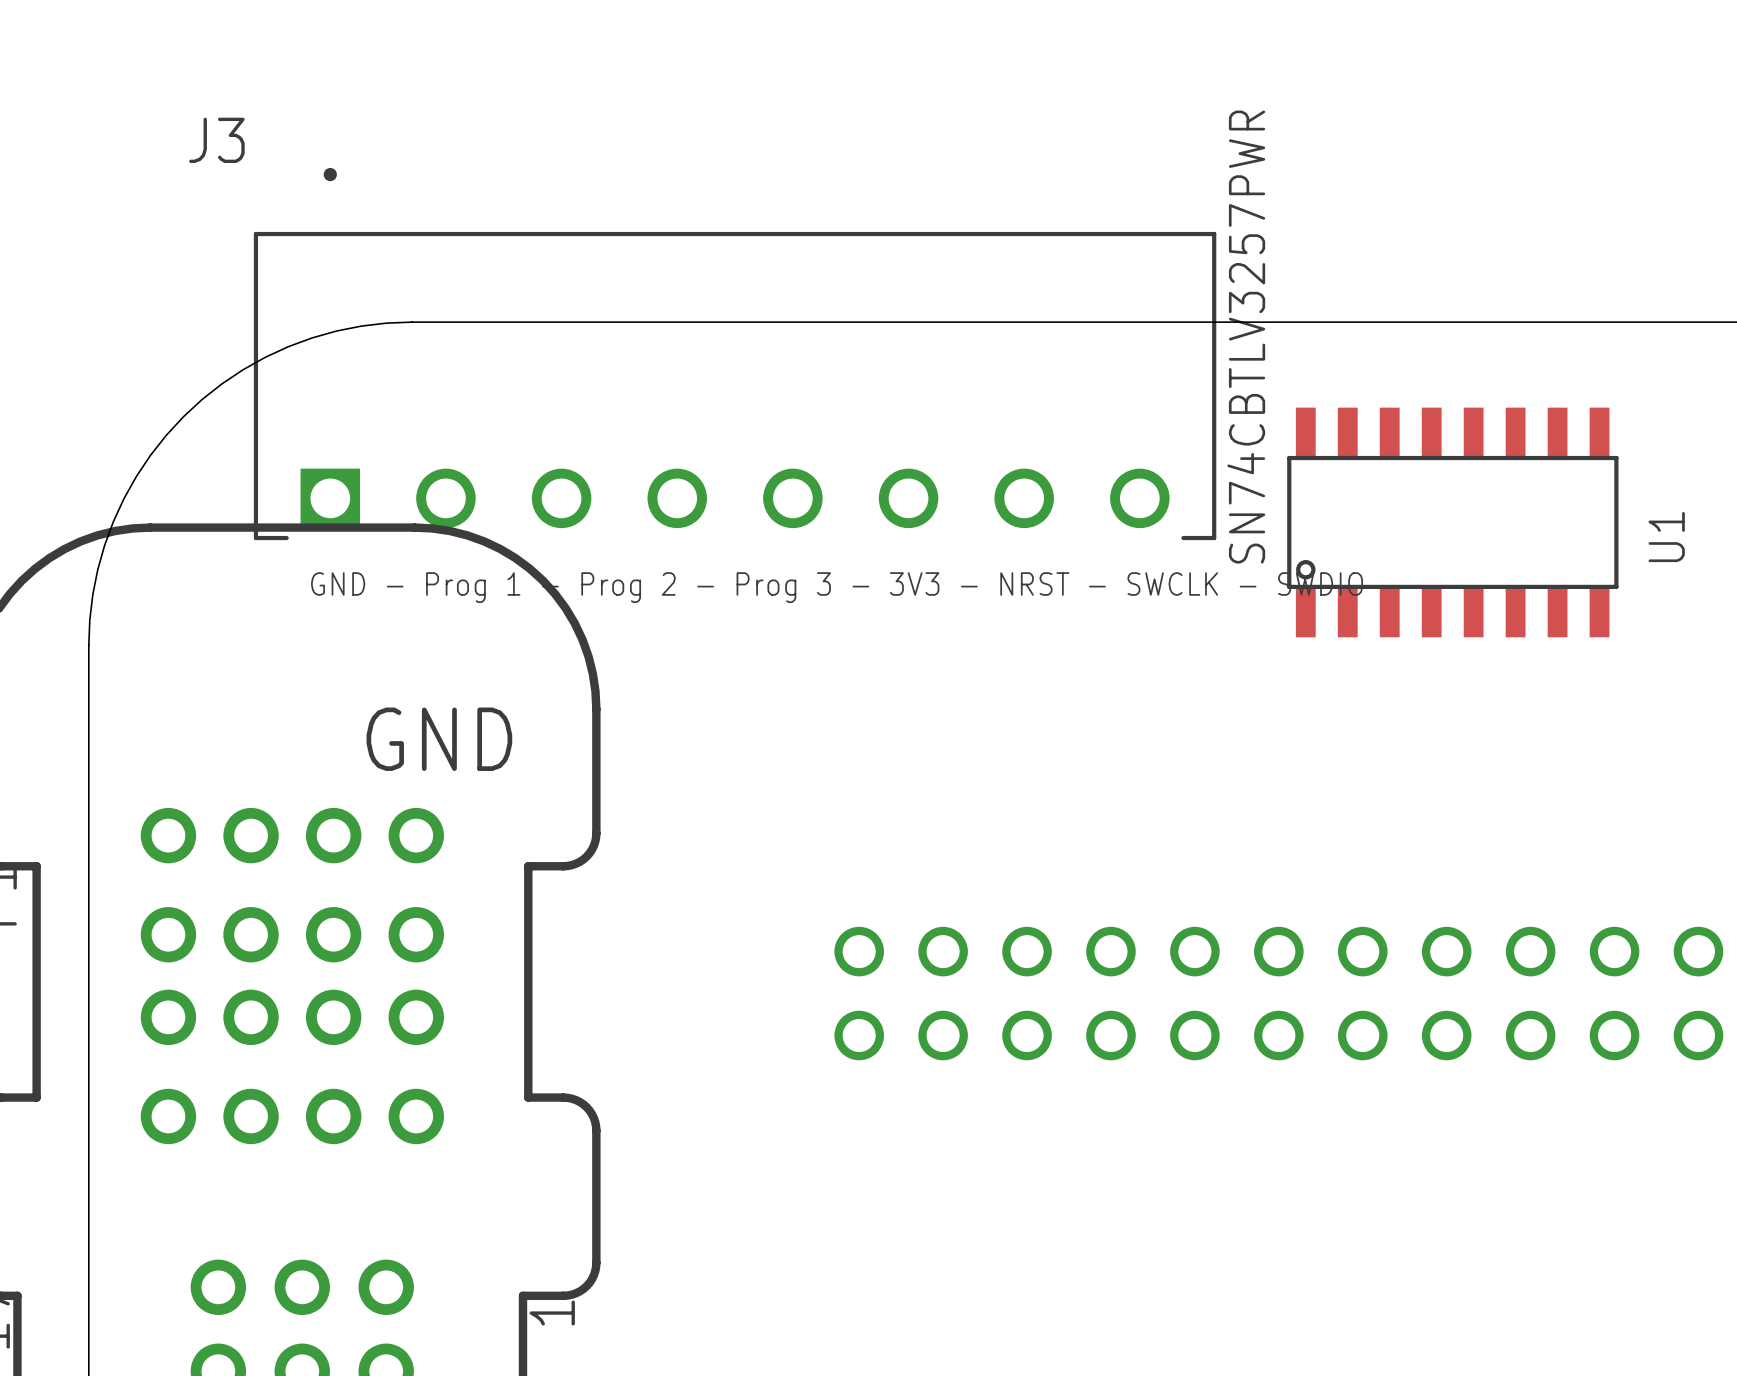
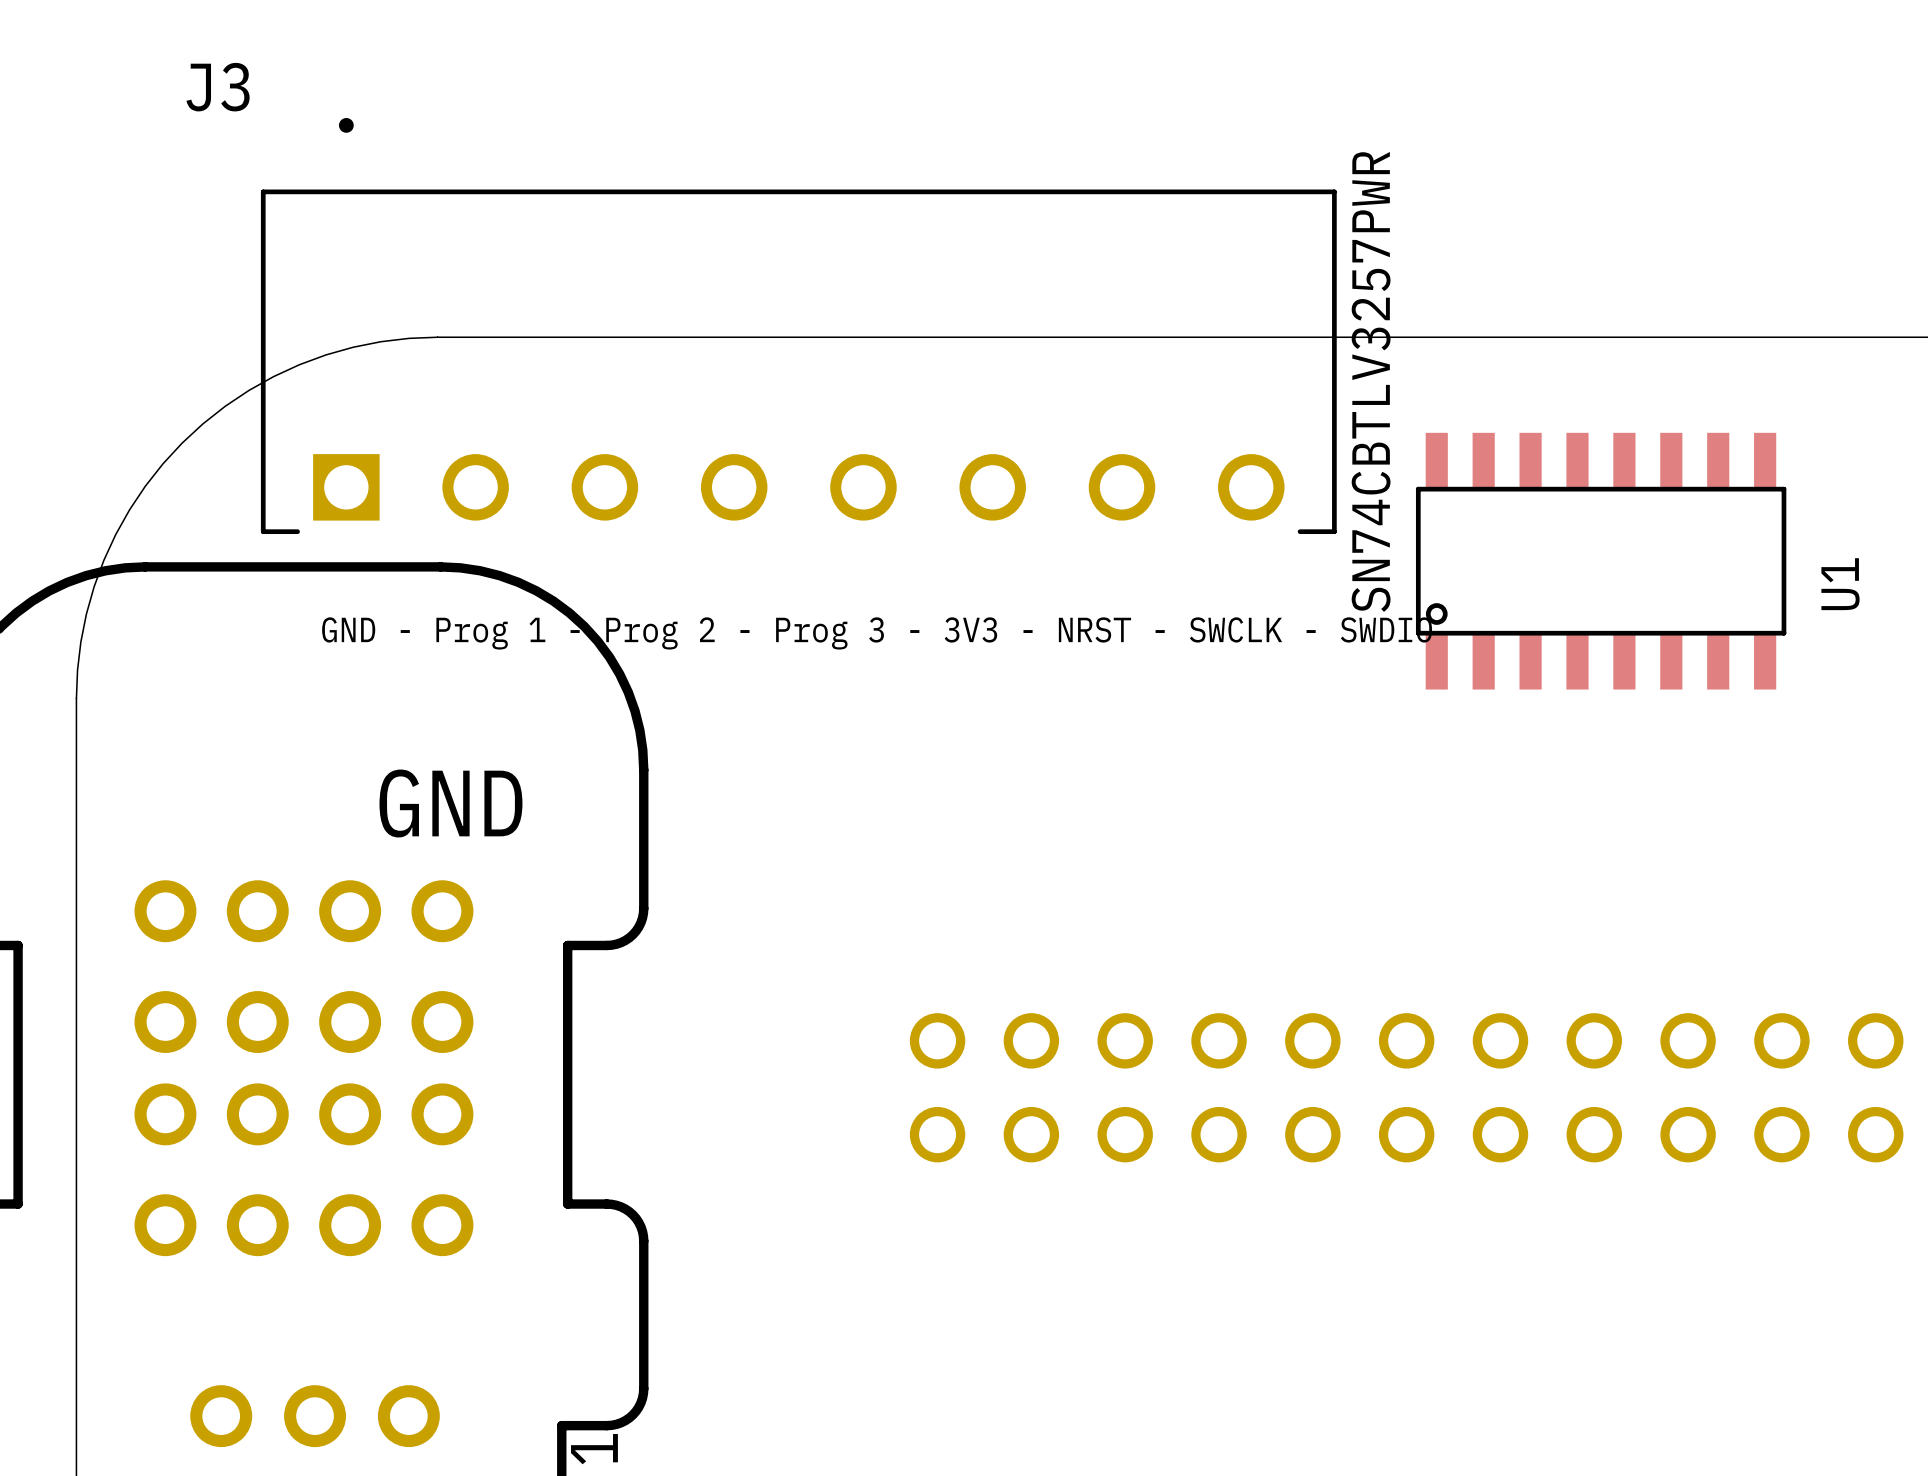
J3 position: (735, 354) -> (798, 326)

